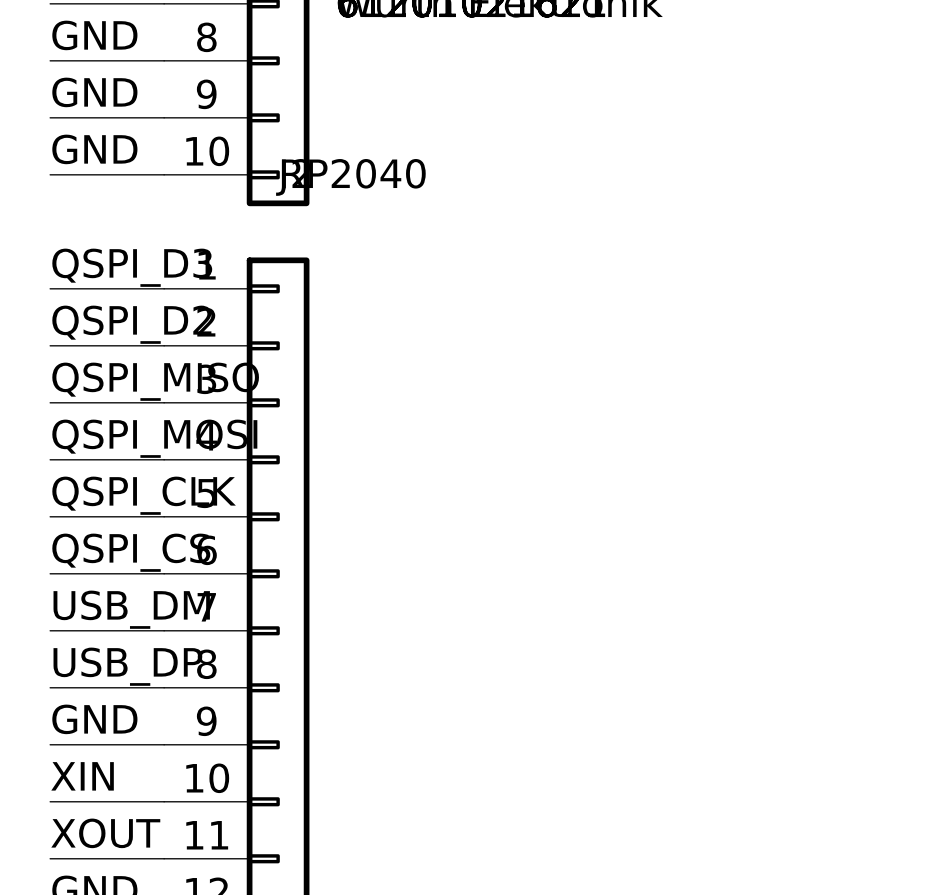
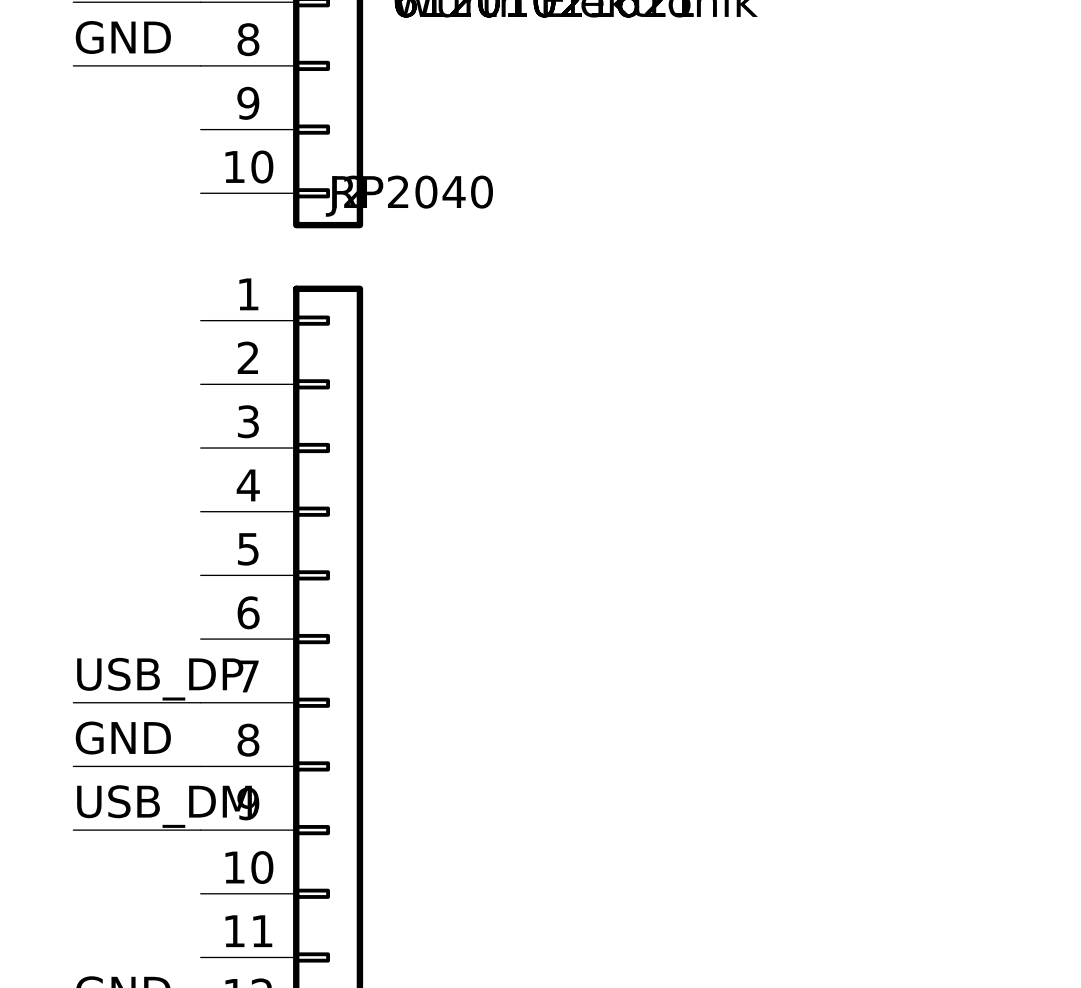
label: GND (94, 92) -> none
wire: (50, 117) (164, 117) -> none
label: GND (94, 149) -> none
wire: (50, 174) (164, 174) -> none
label: QSPI_D3 (132, 267) -> none
wire: (50, 288) (164, 288) -> none
label: QSPI_D2 (131, 324) -> none
wire: (50, 345) (164, 345) -> none
label: QSPI_MISO (155, 381) -> none
wire: (50, 402) (164, 402) -> none
label: QSPI_MOSI (154, 438) -> none
wire: (50, 459) (164, 459) -> none
label: QSPI_CLK (144, 495) -> none
wire: (50, 516) (164, 516) -> none
label: QSPI_CS (131, 552) -> none
wire: (50, 573) (164, 573) -> none
label: USB_DM (131, 609) -> USB_DP (160, 679)
label: USB_DP (127, 666) -> GND (123, 738)
label: GND (94, 719) -> USB_DM (164, 806)
label: XIN (82, 776) -> none
wire: (50, 801) (164, 801) -> none
label: XOUT (105, 833) -> none
wire: (50, 858) (164, 858) -> none

